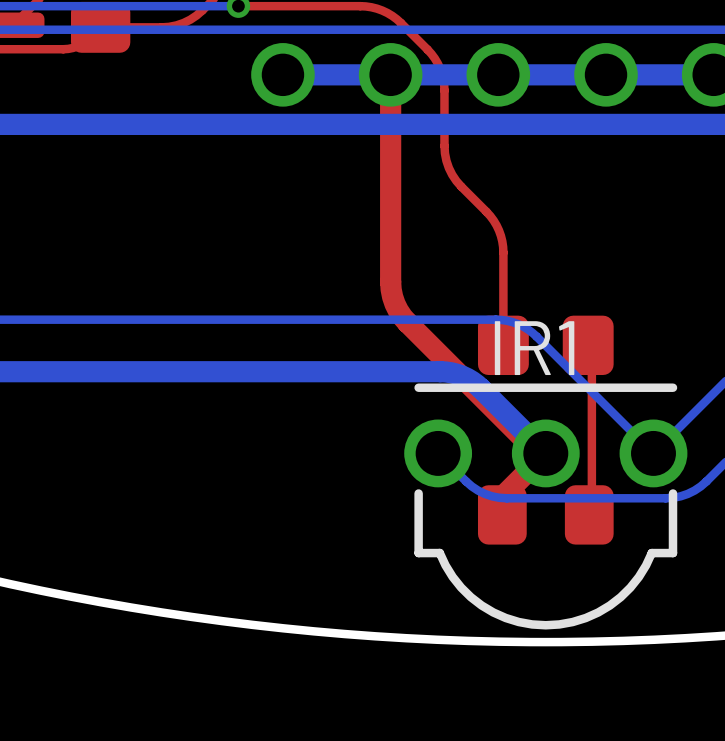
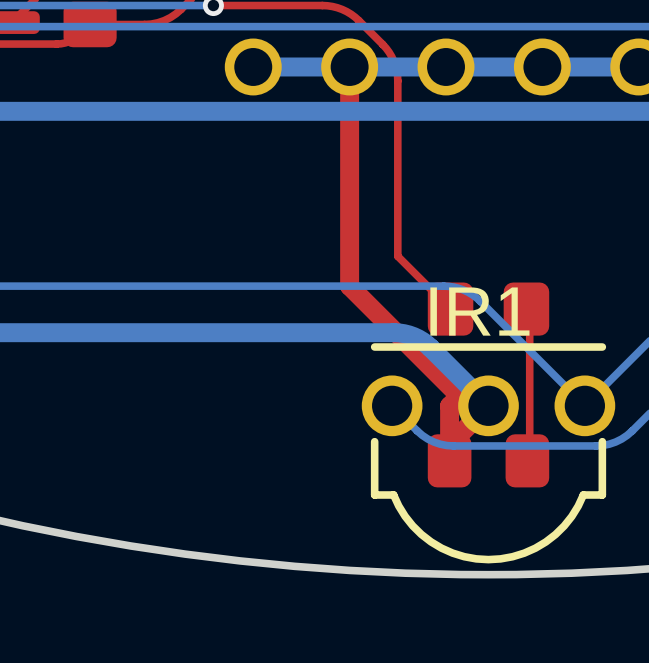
top track: (444, 145) (446, 160) (452, 174) (490, 216) (500, 235) (503, 252) (503, 345) -> (397, 130) (397, 256) (450, 309)
top track: (390, 281) (392, 296) (402, 317) (535, 450) (543, 453) (543, 456) -> (349, 252) (349, 286) (455, 392) (455, 399) (449, 405) (449, 452)

